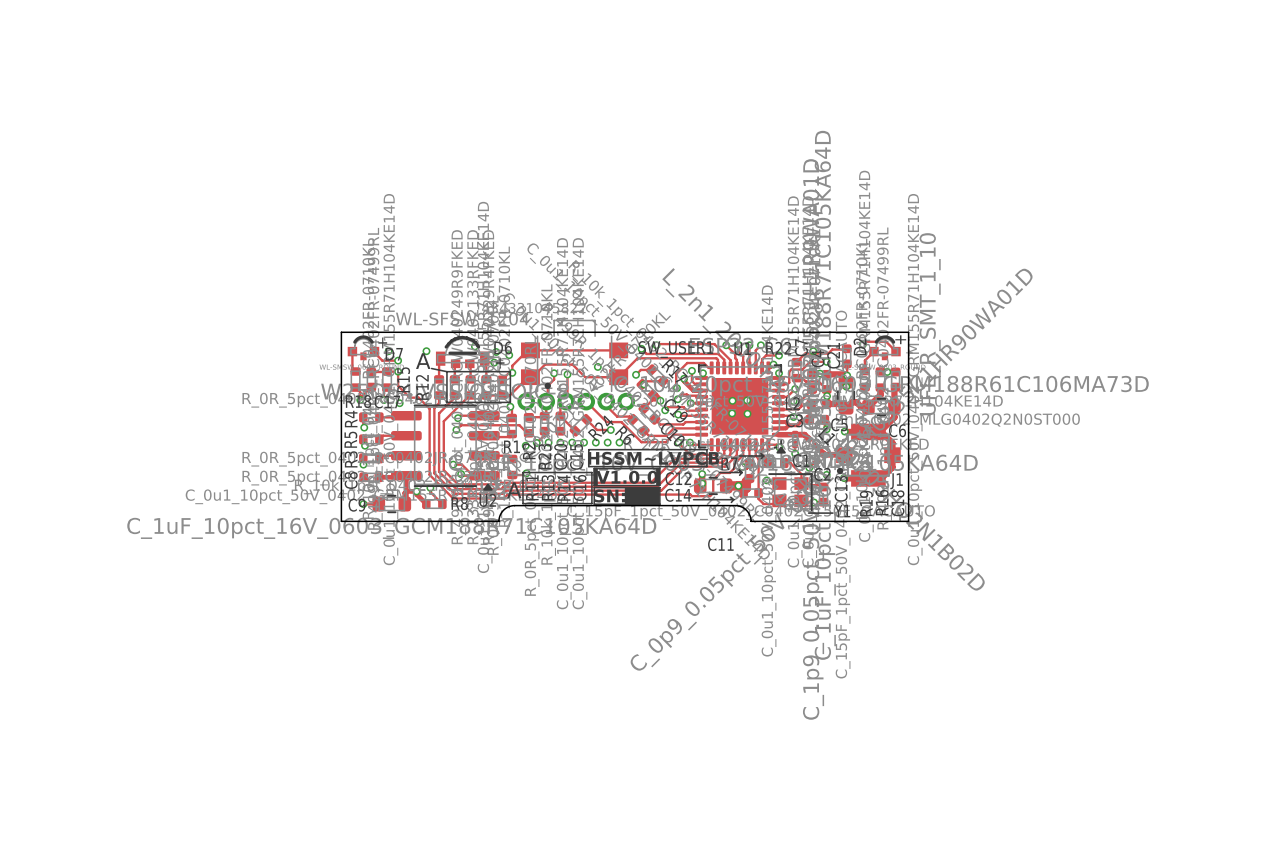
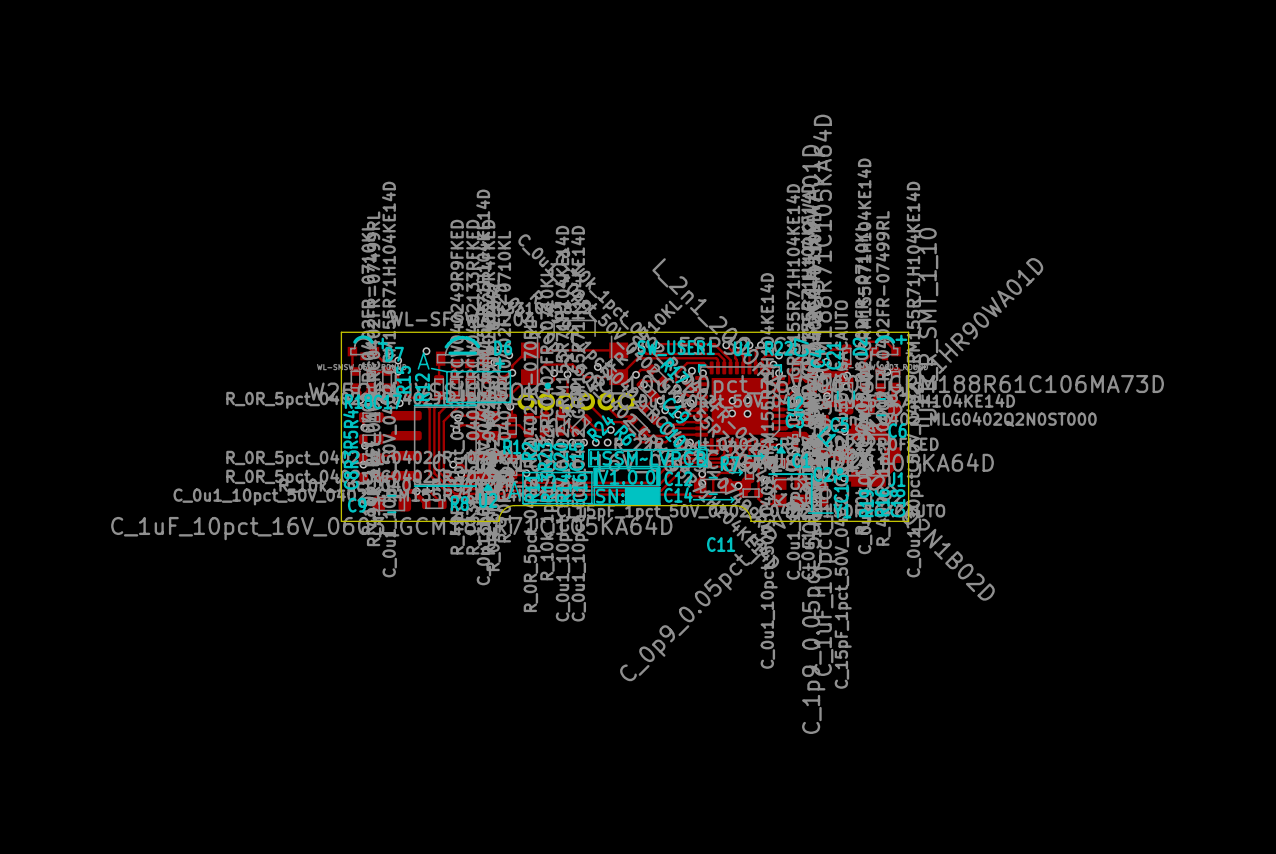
line: (739, 455) (747, 455) -> none
line: (719, 472) (729, 472) -> none

